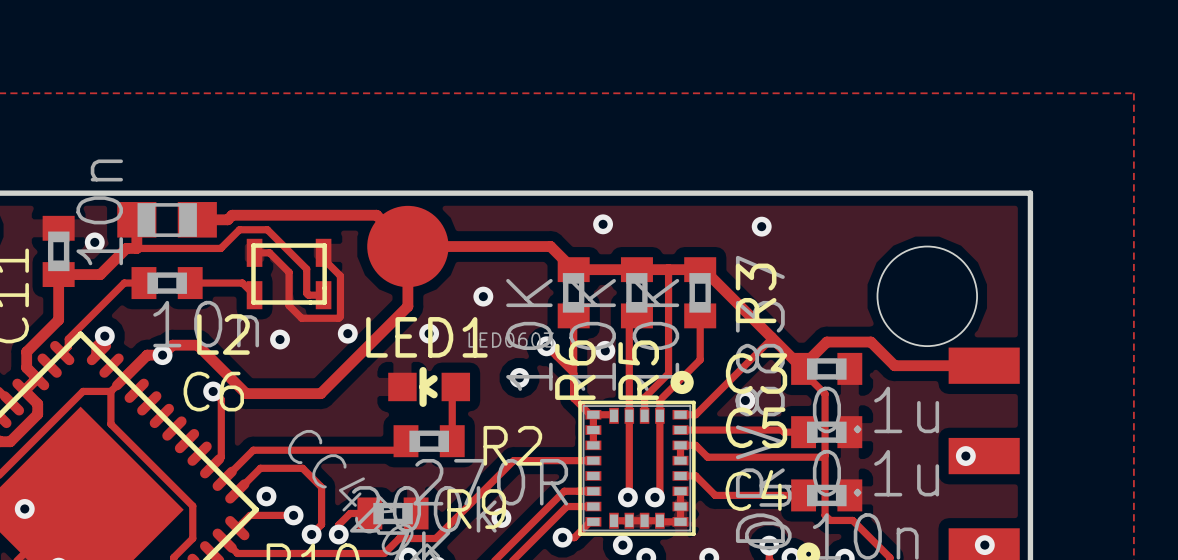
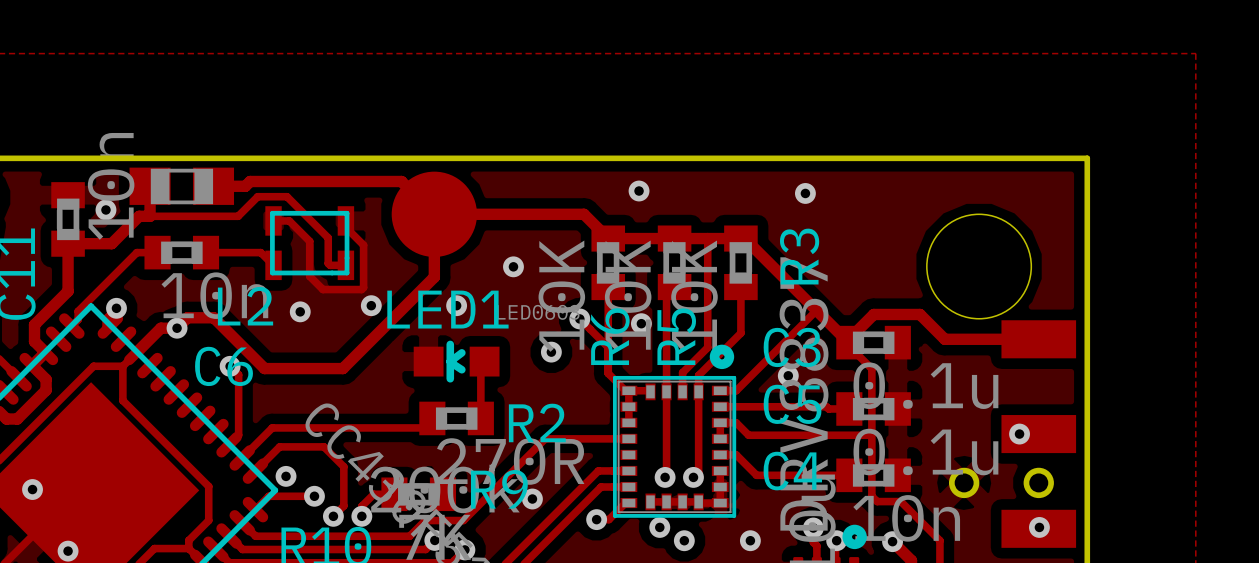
part: none -> (1001, 482)

